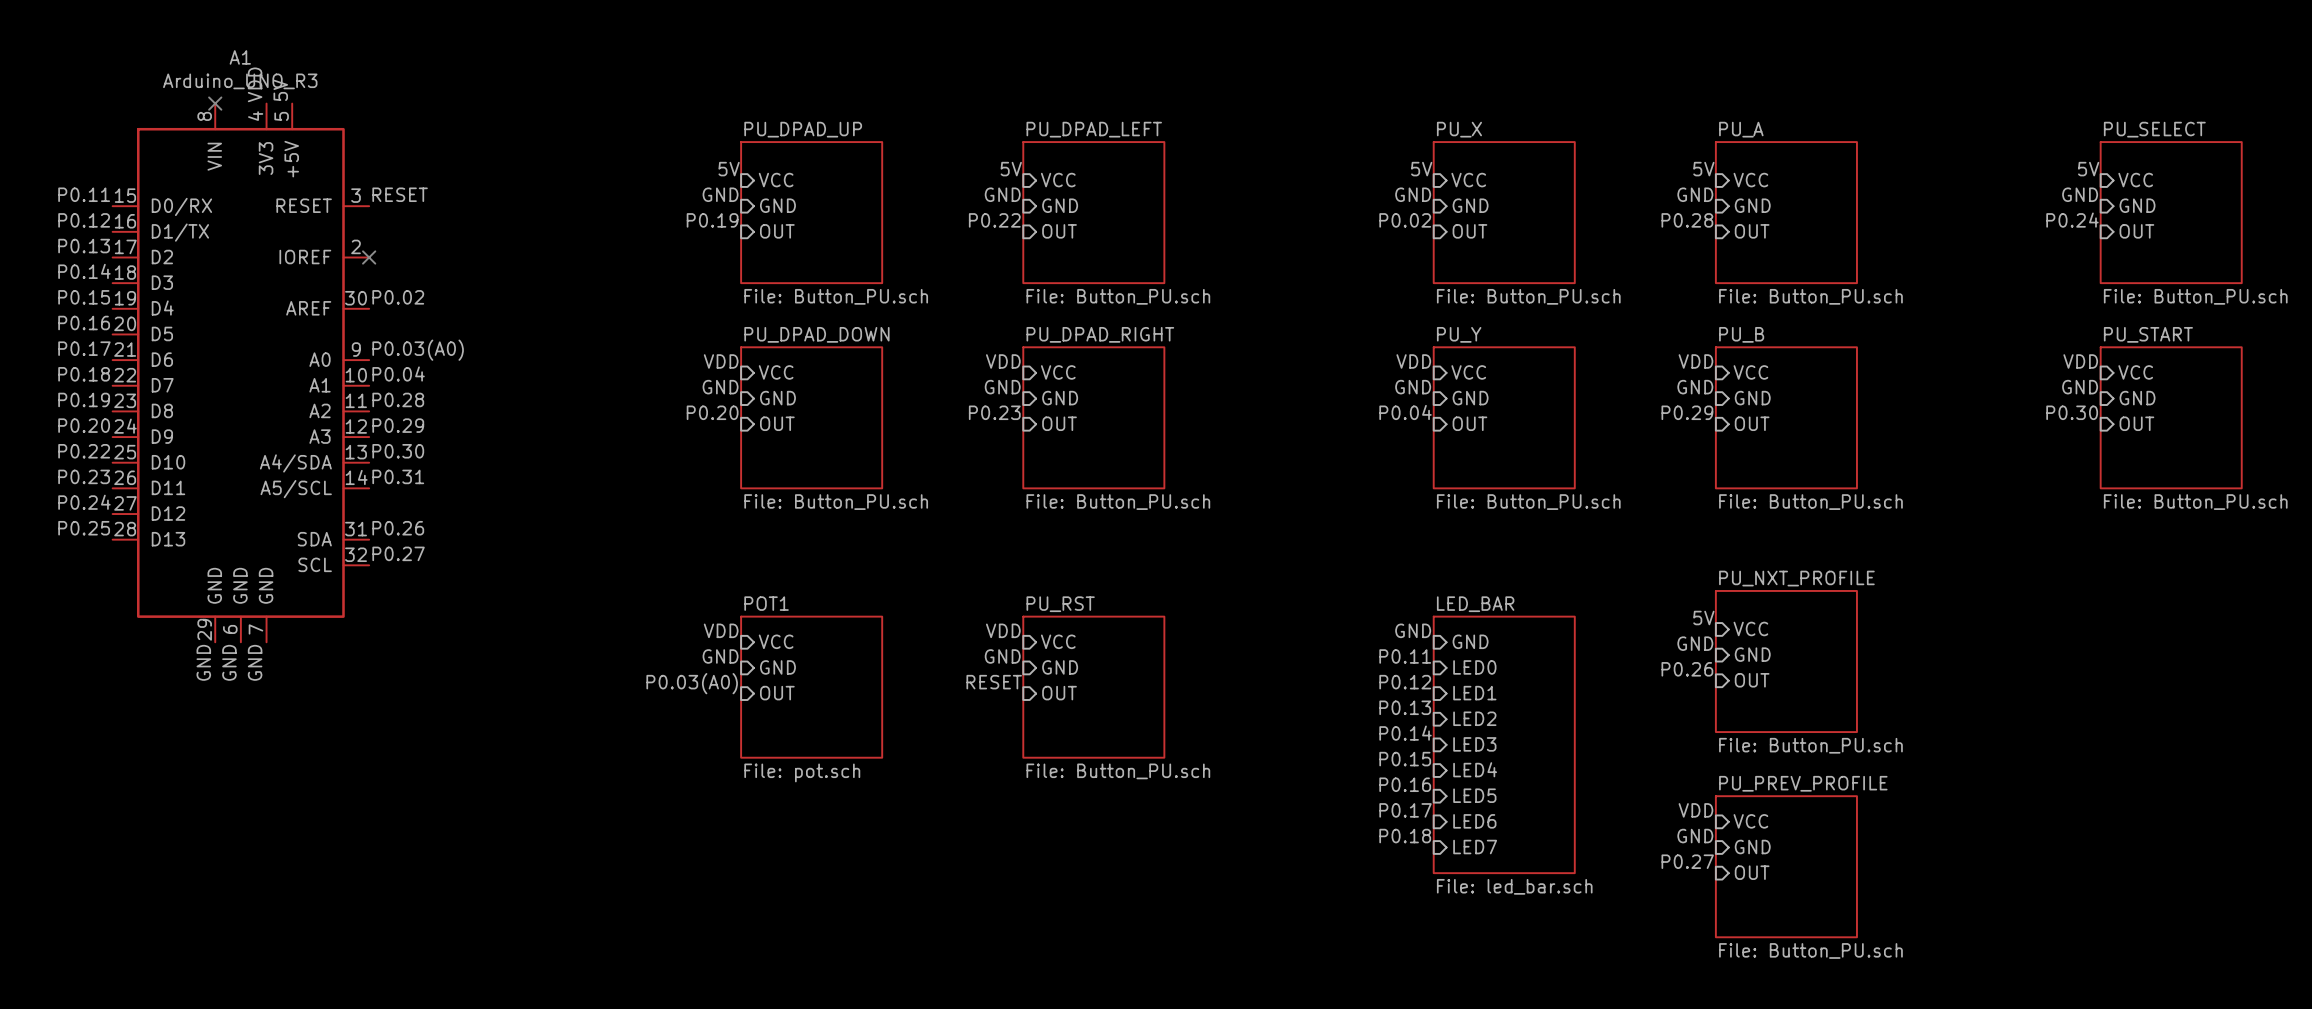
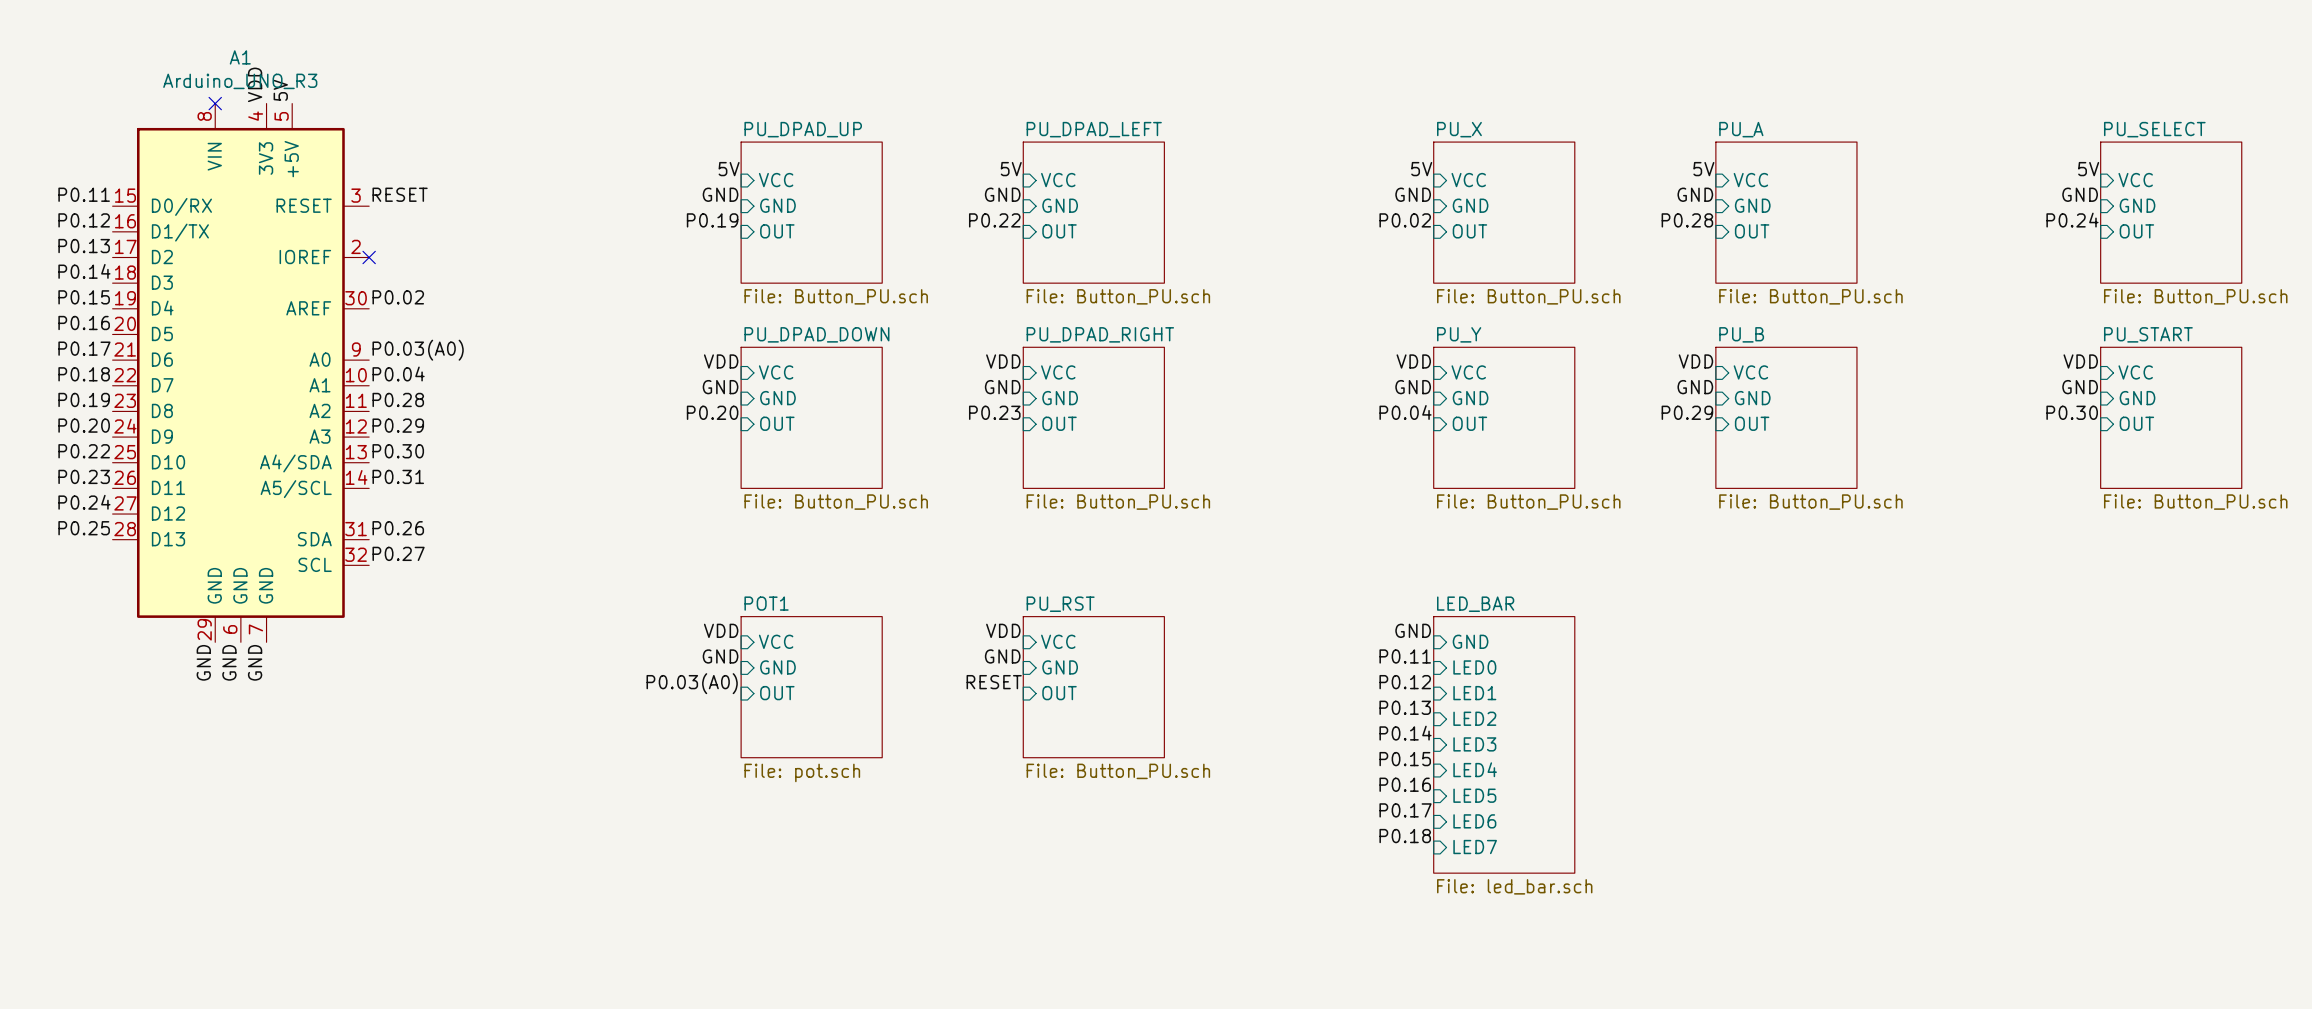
label: 5V (1703, 618) -> none
sheet pin: VCC (1750, 628) -> none
label: GND (1695, 643) -> none
sheet pin: GND (1752, 654) -> none
sheet PU_NXT_PROFILE: File: Button_PU.sch (1786, 661) -> none
label: P0.26 (1687, 669) -> none
sheet pin: OUT (1752, 680) -> none
label: VDD (1695, 810) -> none
sheet pin: VCC (1750, 821) -> none
label: GND (1695, 836) -> none
sheet pin: GND (1752, 847) -> none
label: P0.27 (1687, 861) -> none
sheet PU_PREV_PROFILE: File: Button_PU.sch (1786, 866) -> none
sheet pin: OUT (1752, 872) -> none

